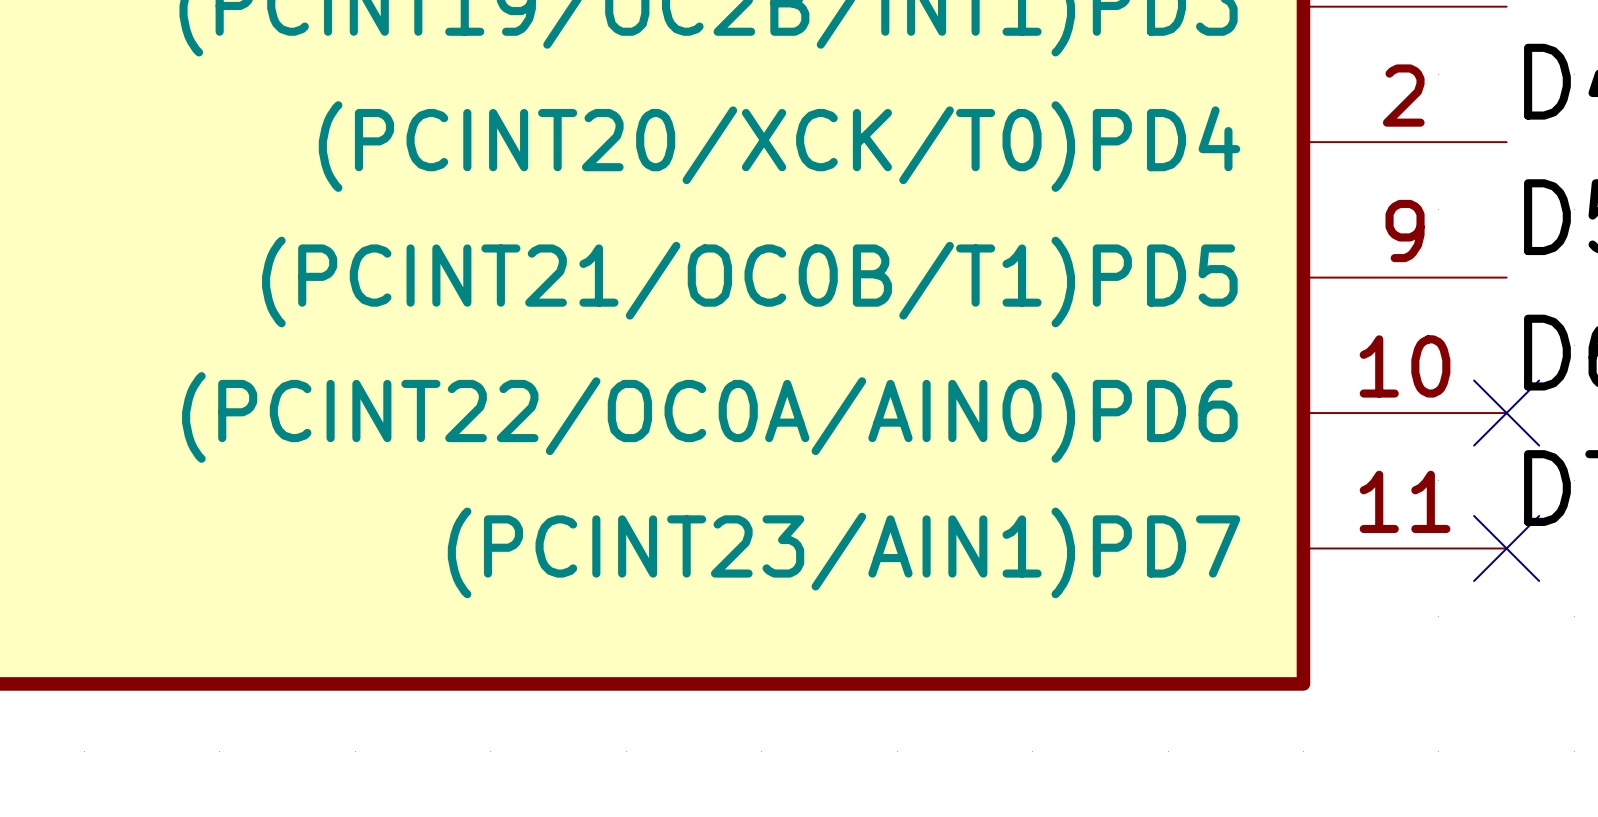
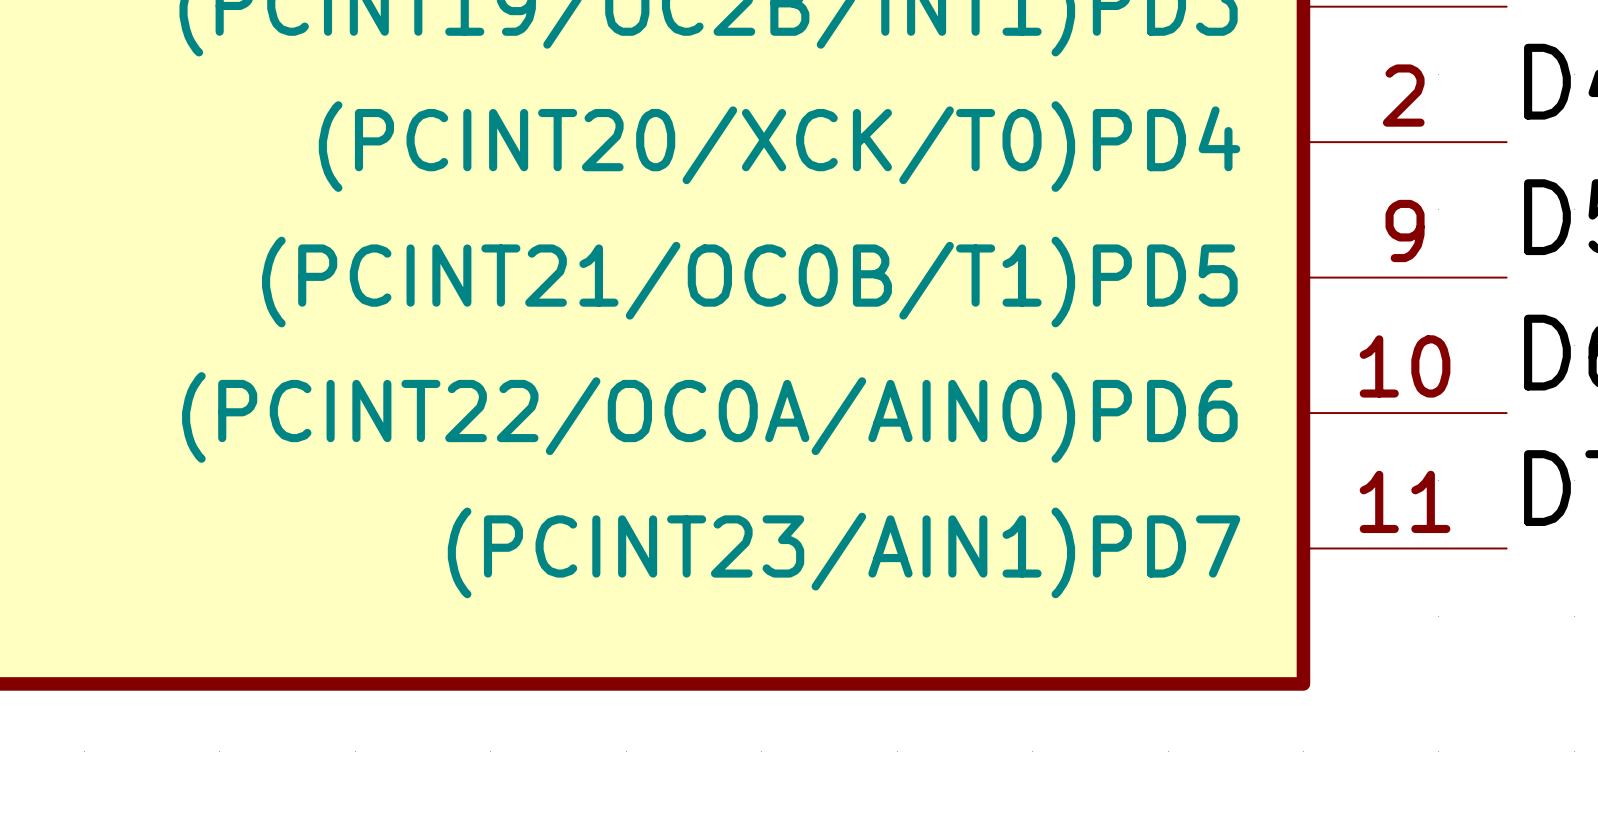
no-connect mark: (1506, 413) -> none
no-connect mark: (1506, 548) -> none

